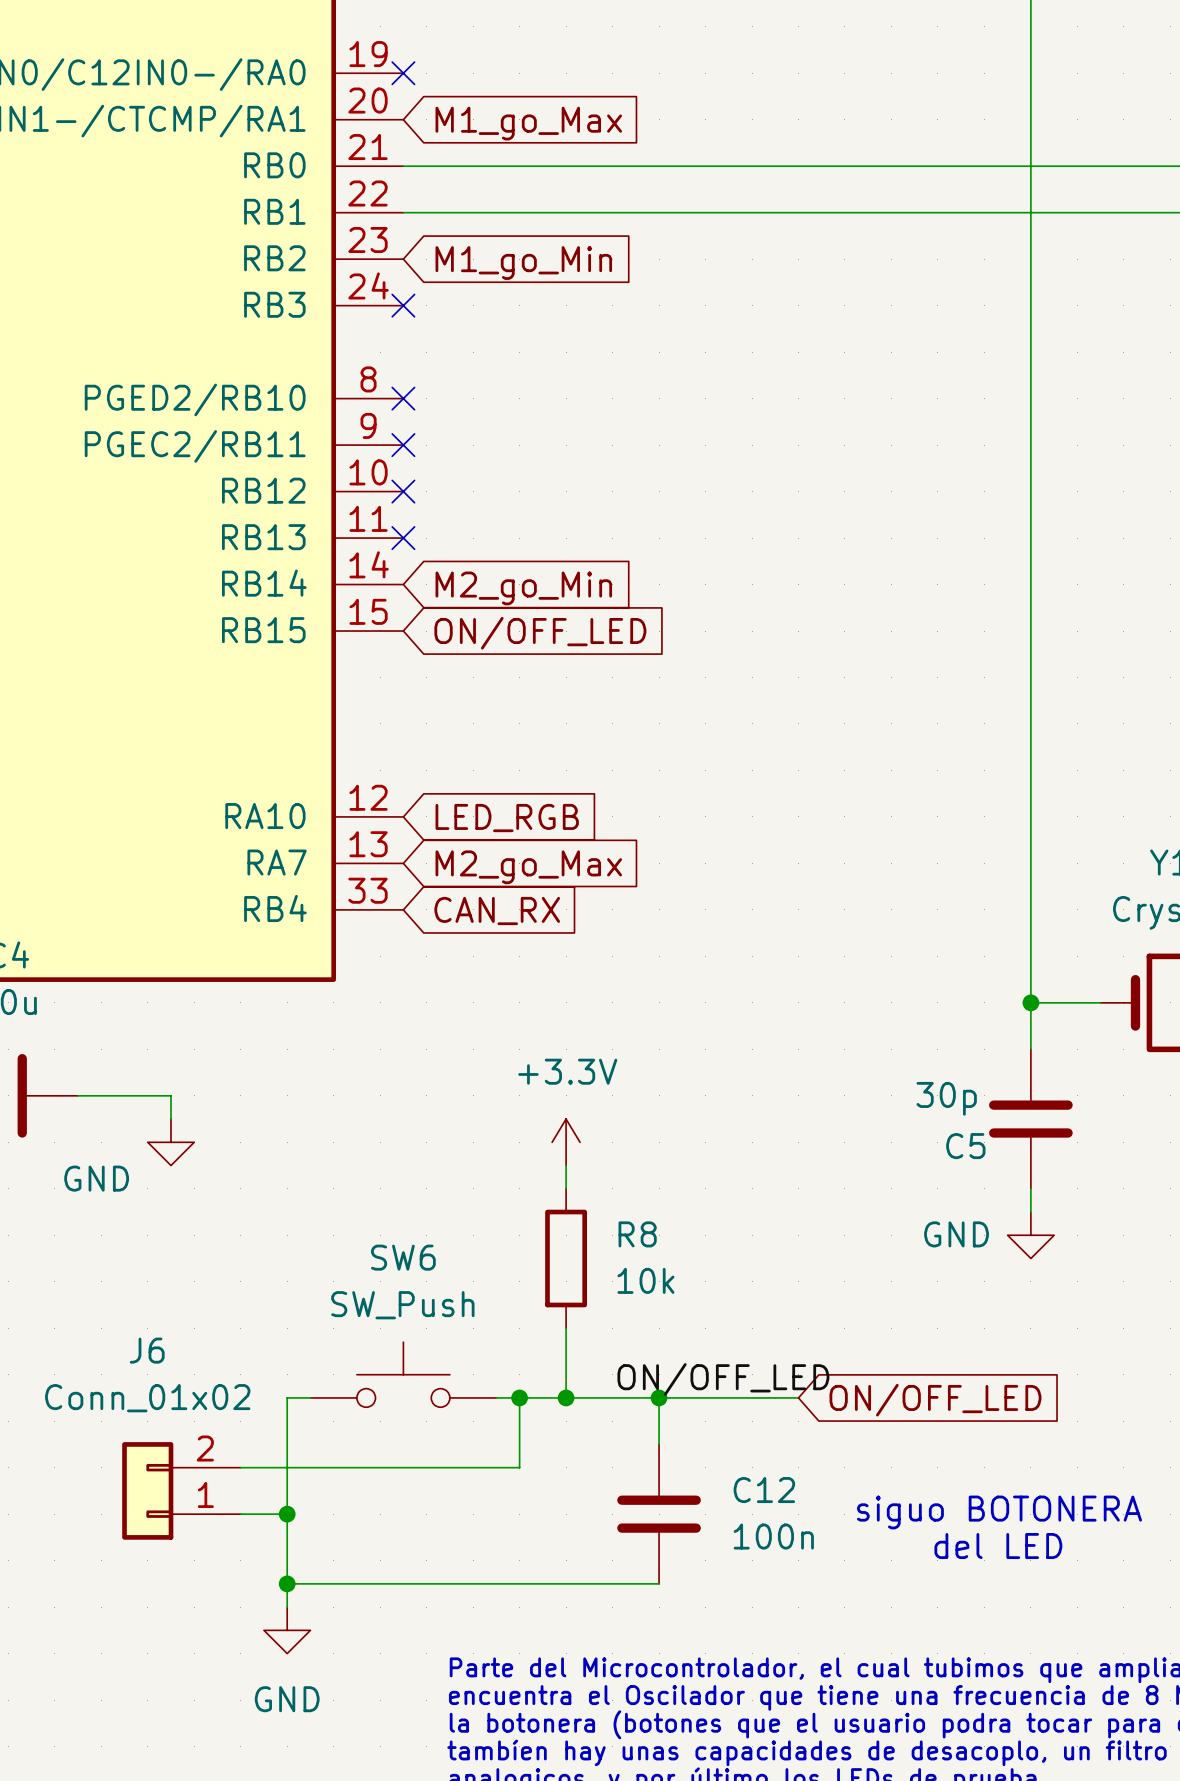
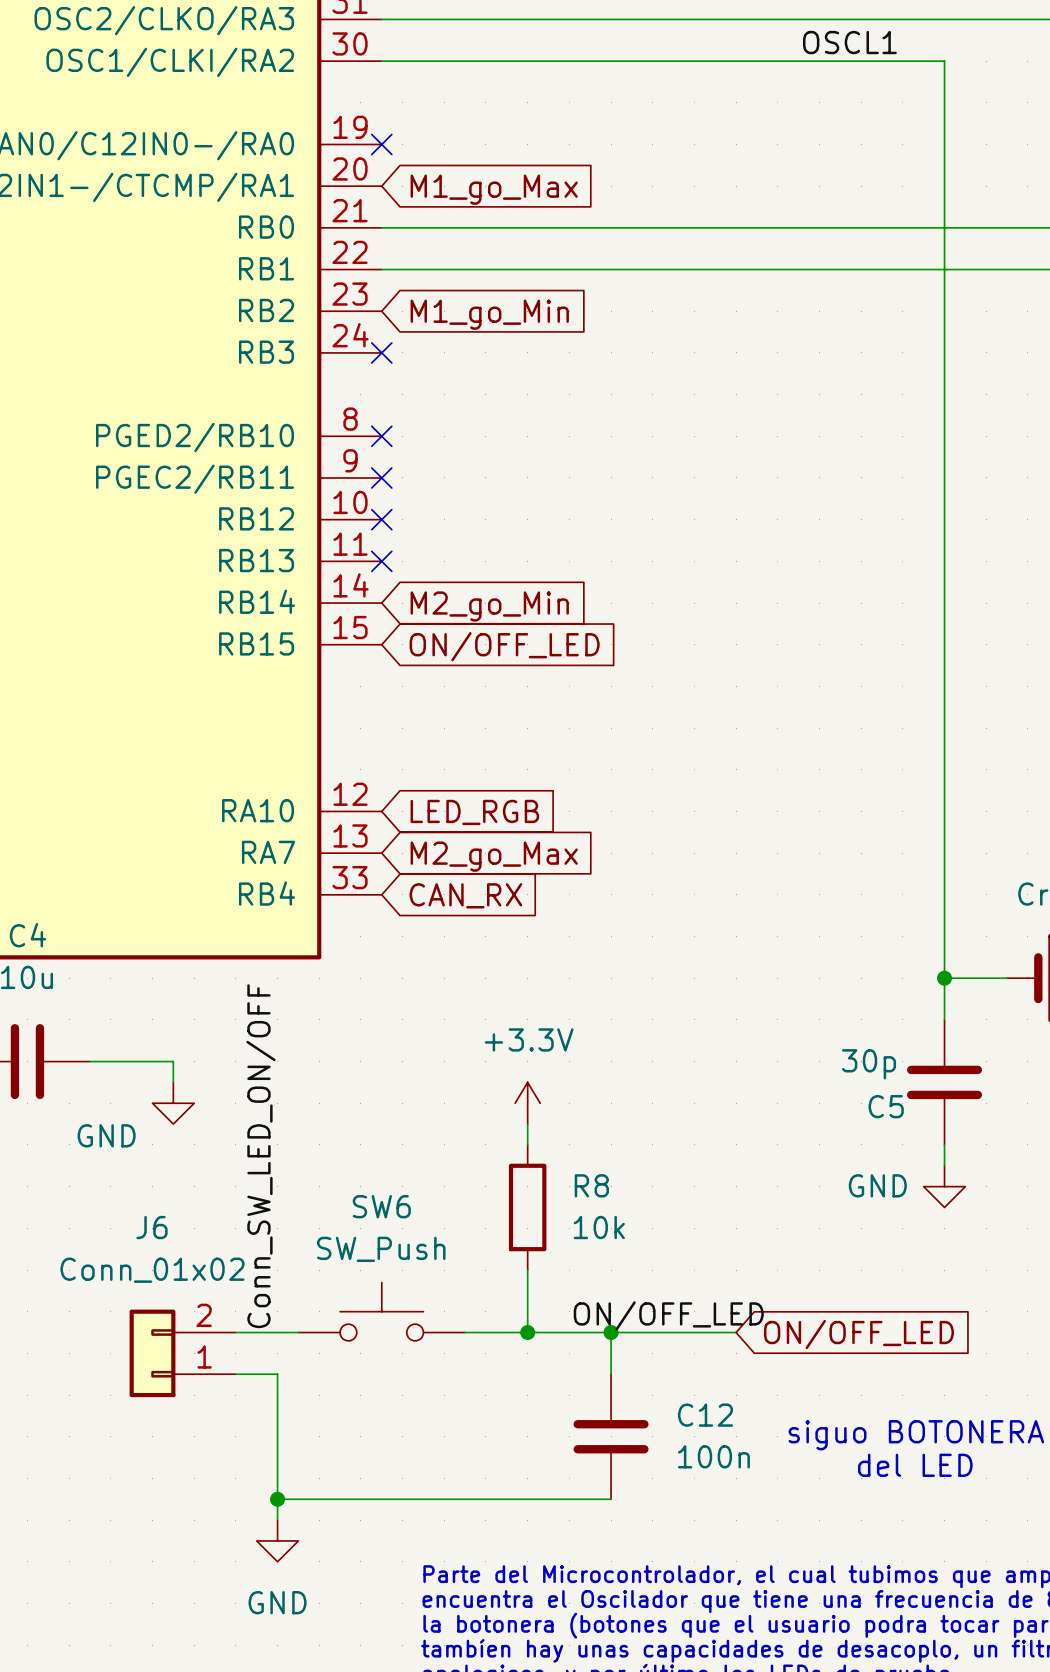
label: none -> Conn_SW_LED_ON/OFF (260, 1156)
wire: (287, 1397) (287, 1444) -> (277, 1332) (235, 1332)
wire: (519, 1397) (519, 1467) (240, 1467) -> none
junction: (519, 1397) -> none
J6 position: (181, 1490) -> (182, 1353)
wire: (240, 1514) (287, 1514) -> (235, 1374) (277, 1374)
junction: (287, 1514) -> none

